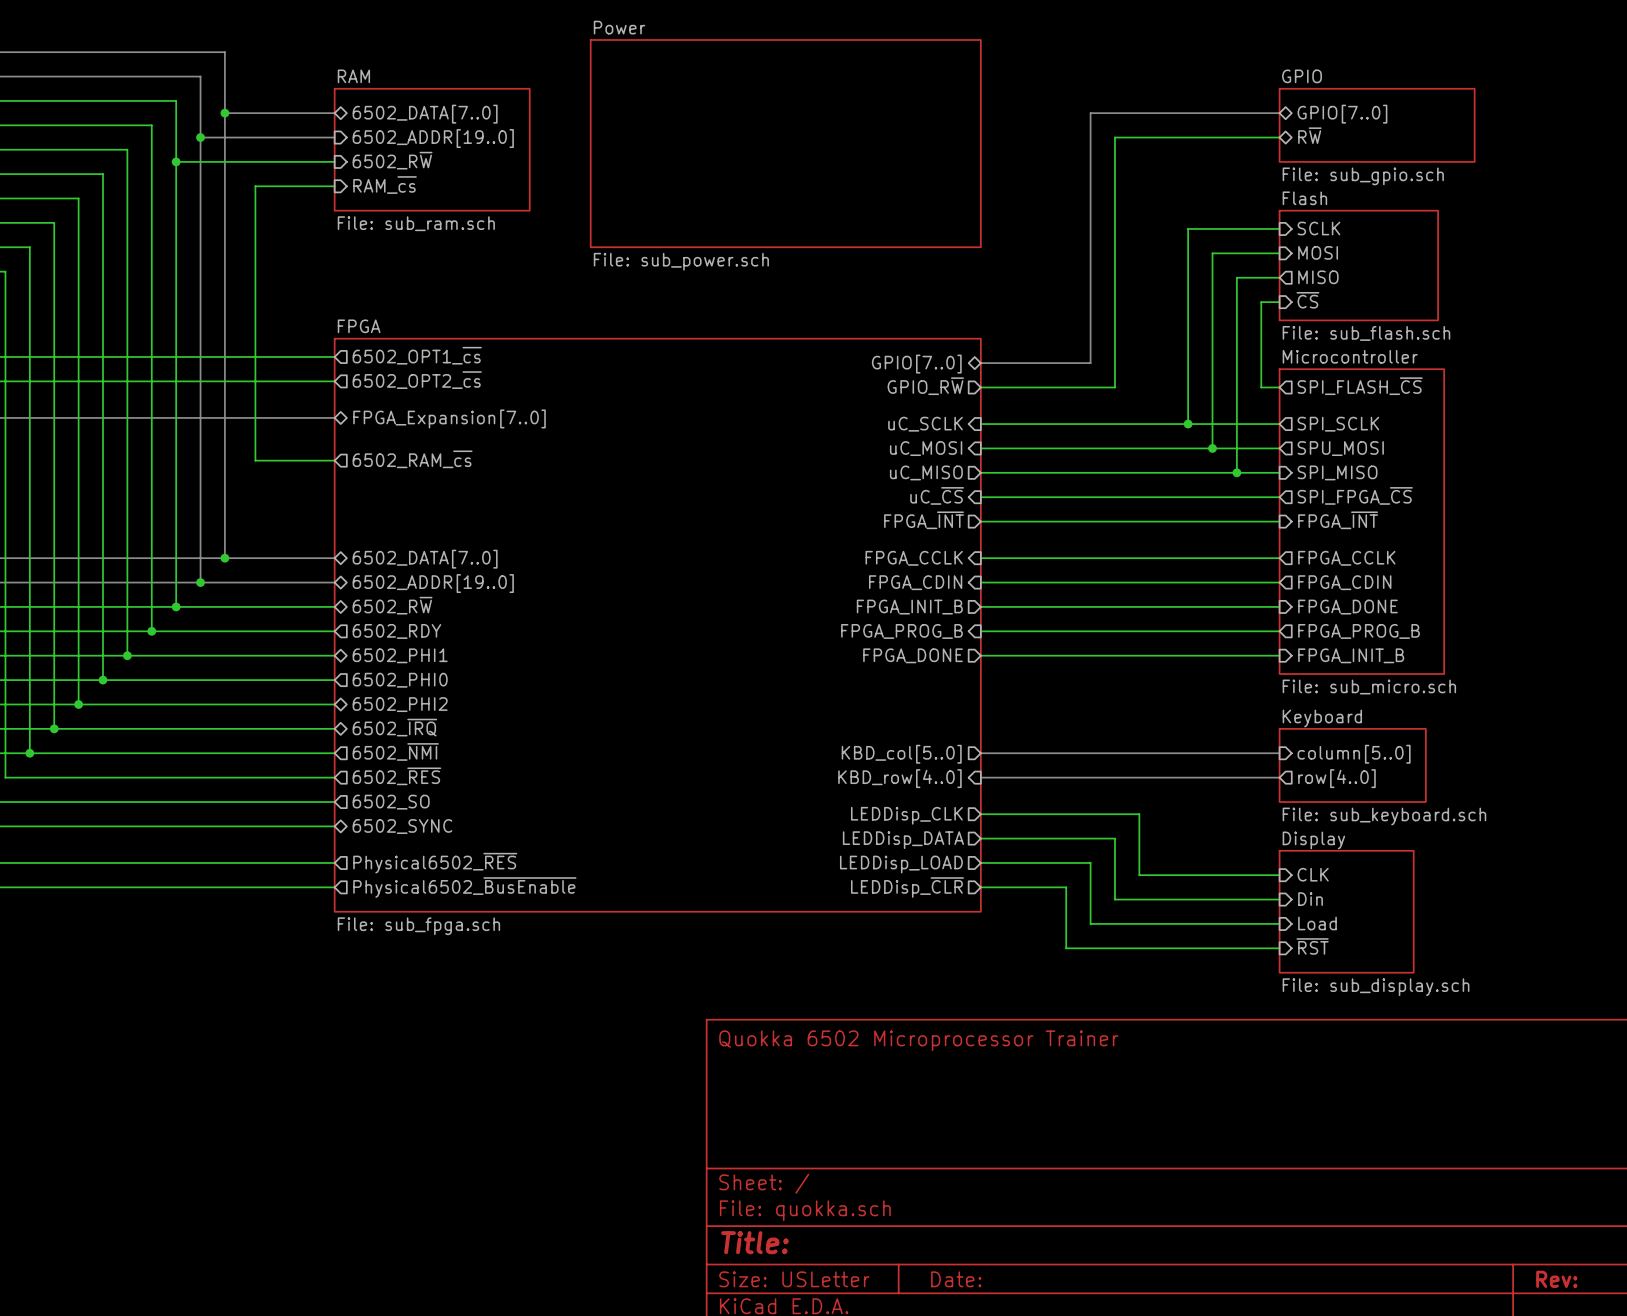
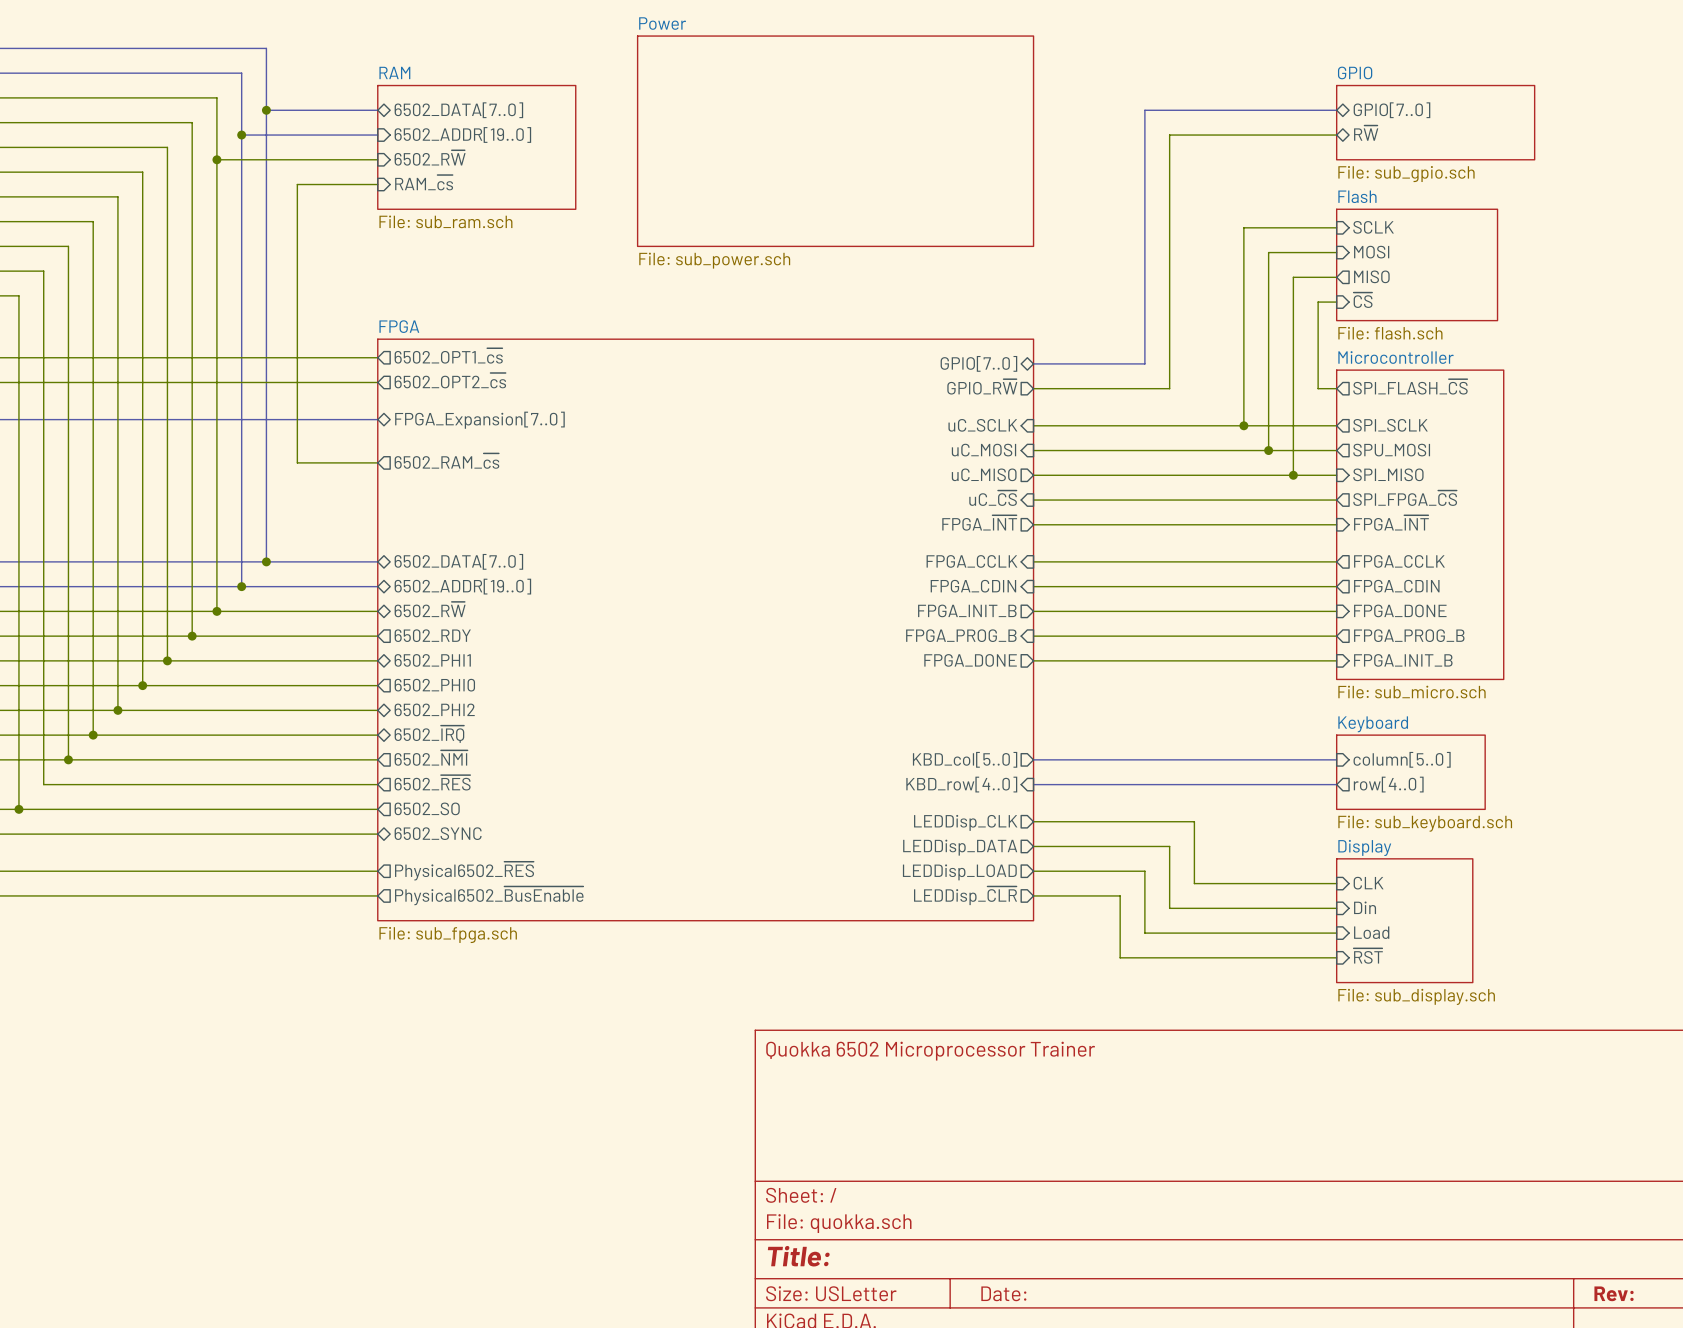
sheet Flash value: File: sub_flash.sch (1366, 333) -> File: flash.sch (1390, 333)

